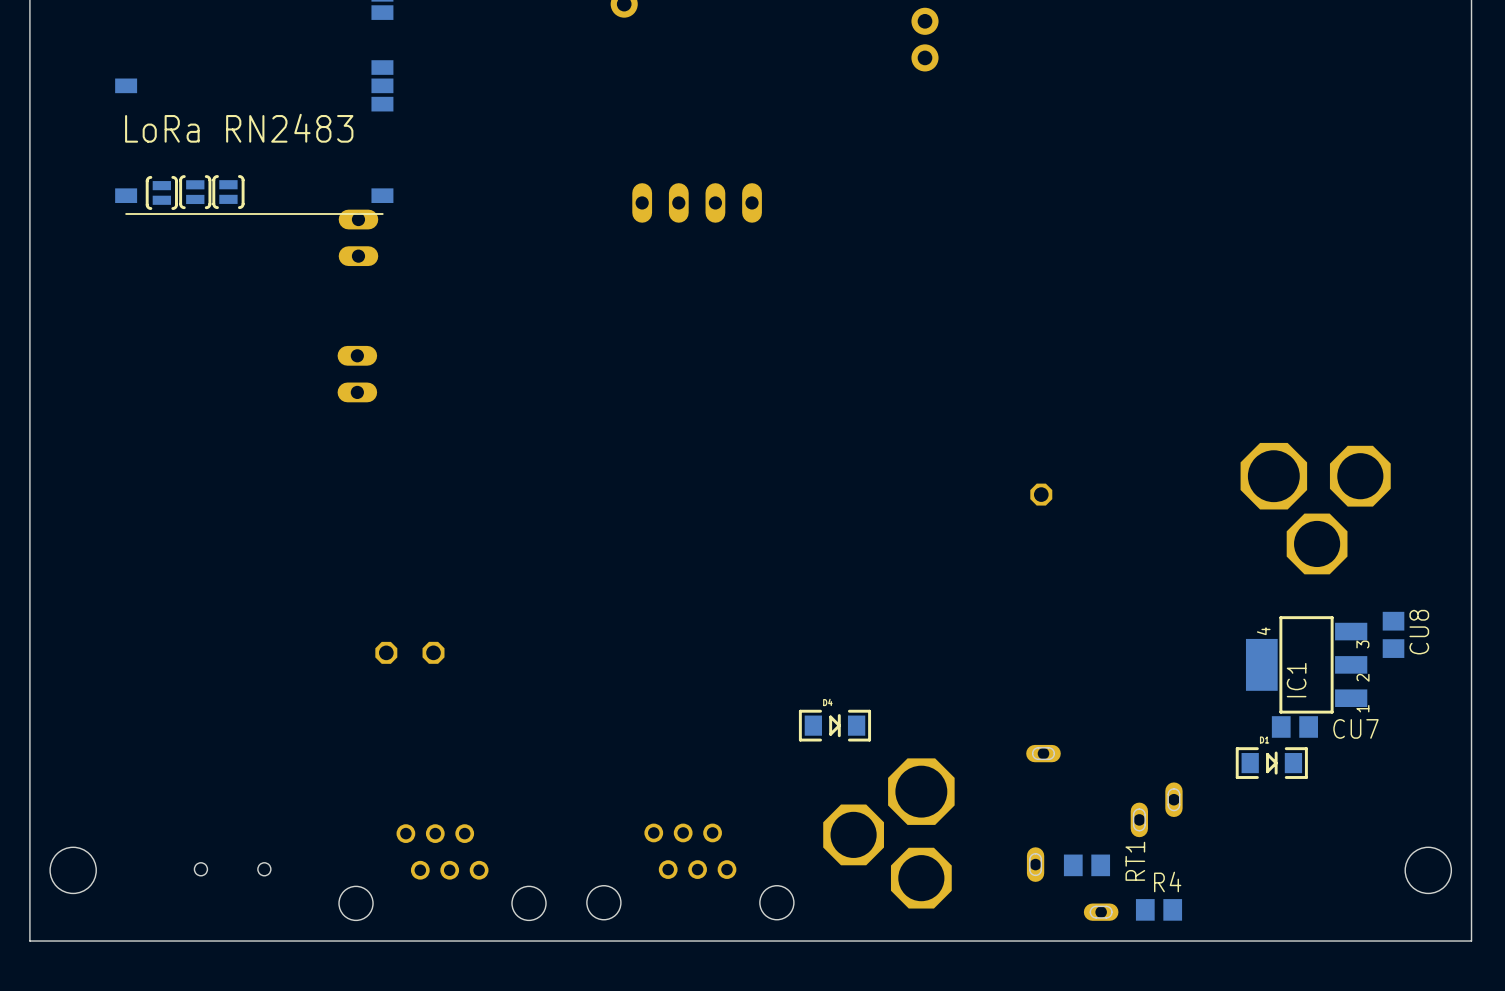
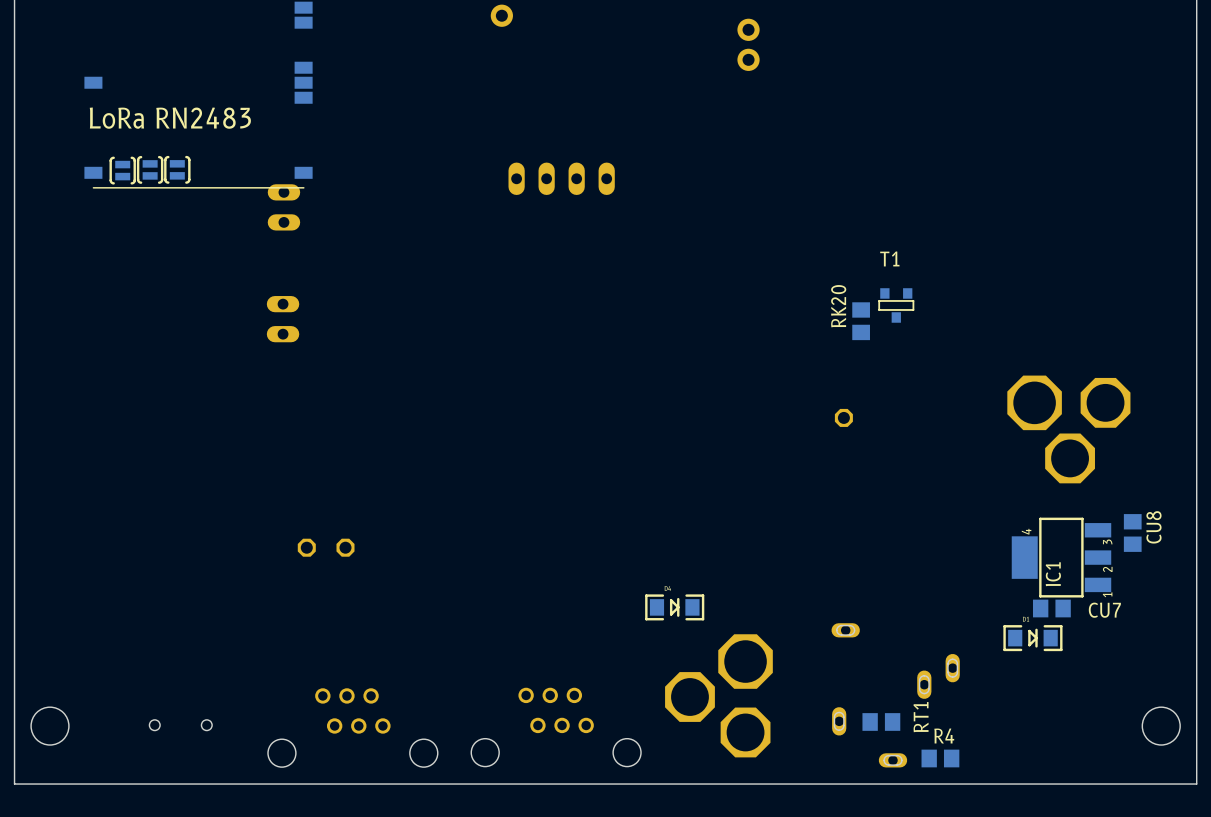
T1: none -> (896, 305)
RK20: none -> (861, 321)

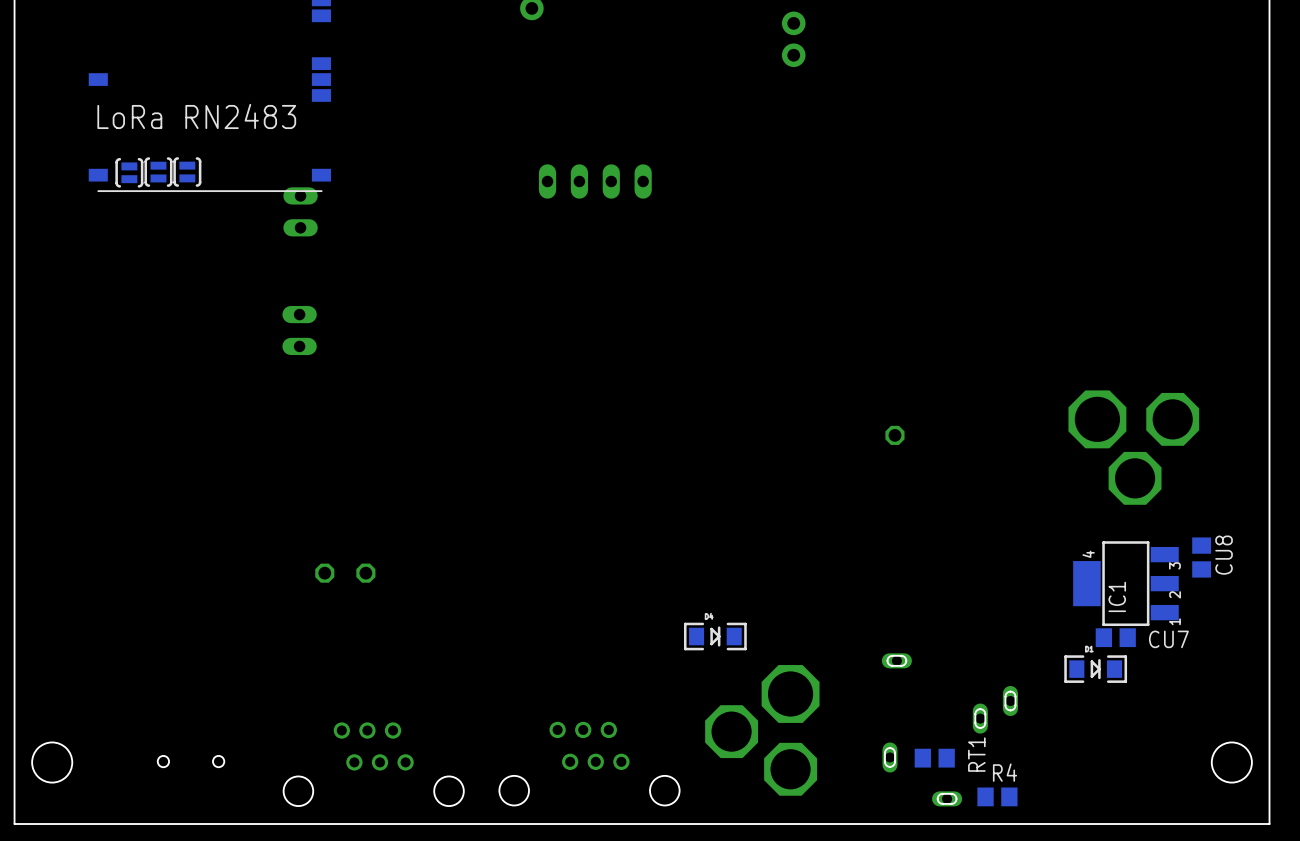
T1: (896, 305) -> none
RK20: (861, 321) -> none

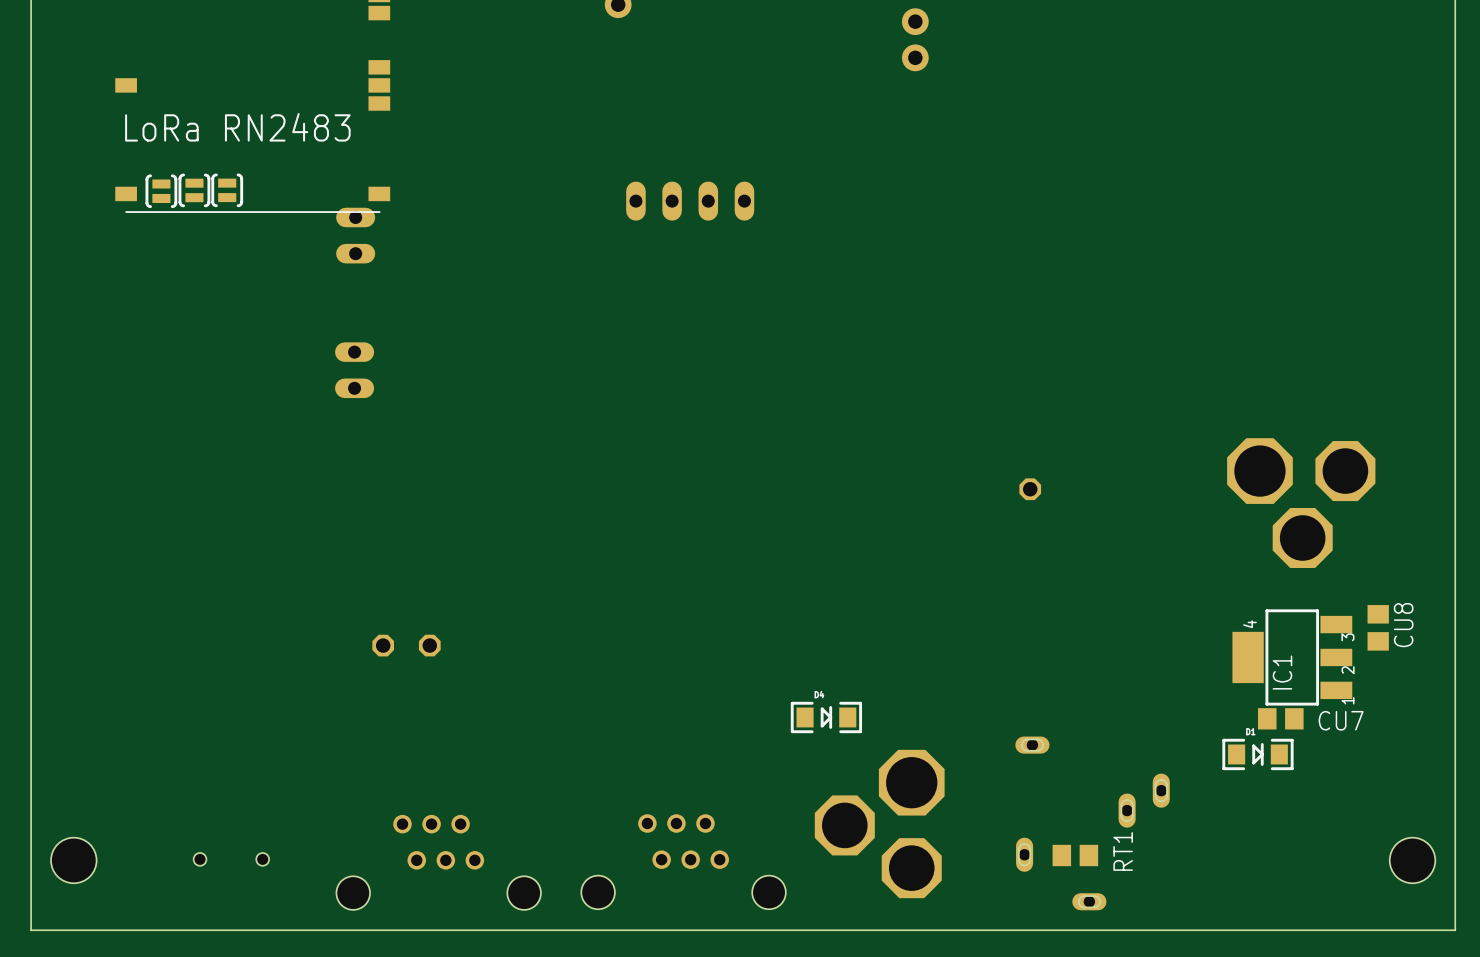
R4: (997, 796) -> none

